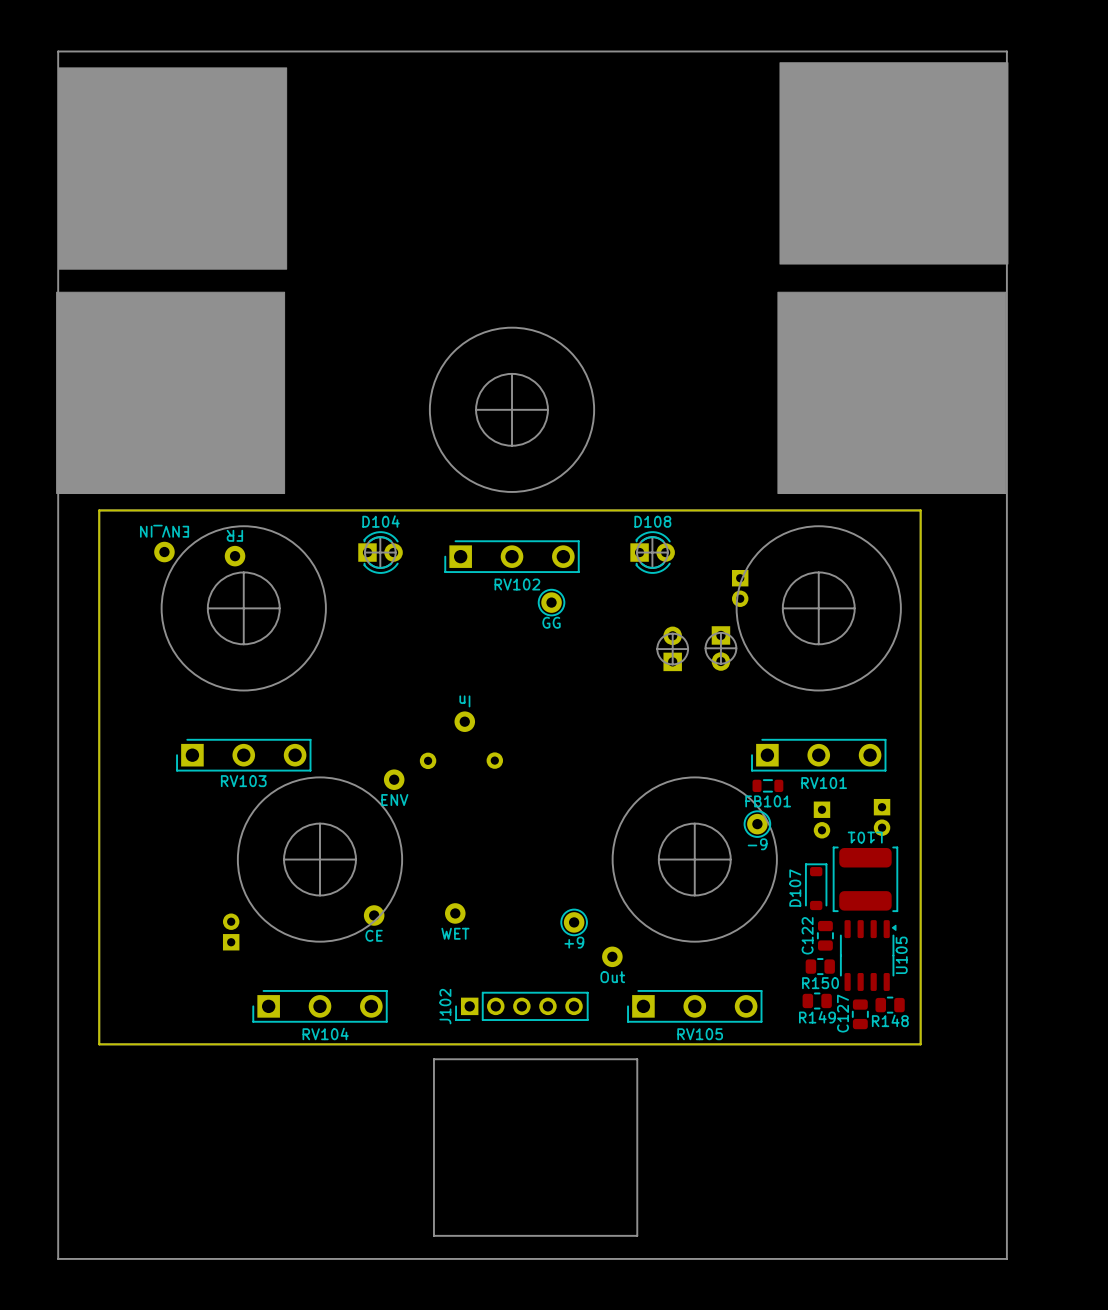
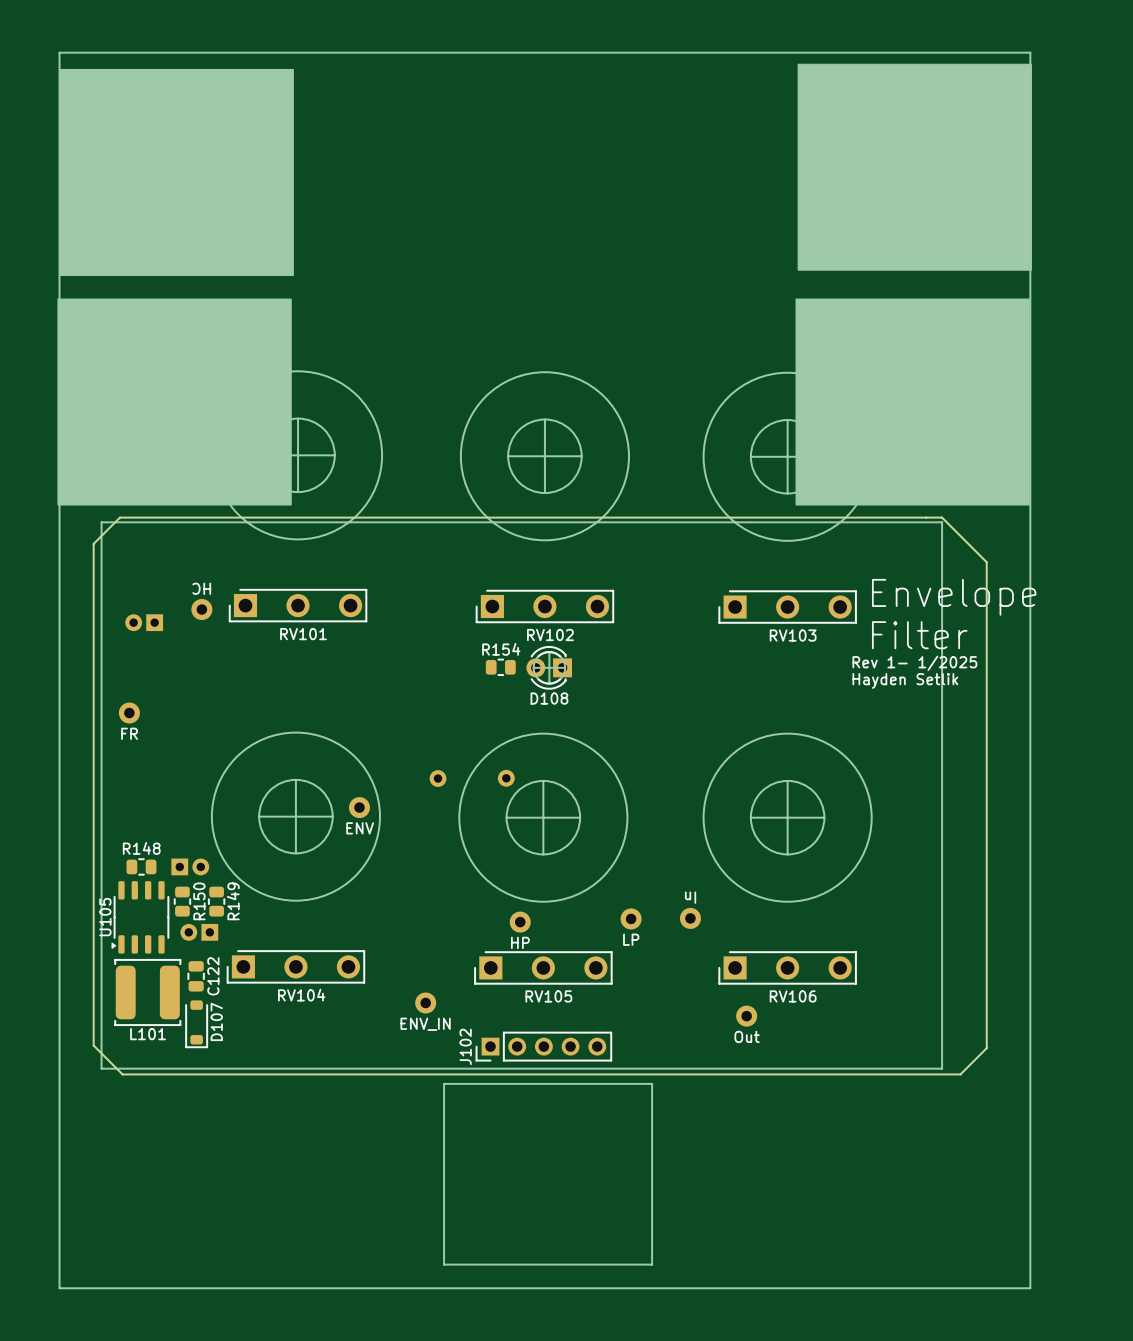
RV102 position: (512, 449) -> (544, 497)
board edge: (99, 510) (920, 510) (920, 1044) (99, 1044) (99, 510) -> (119, 517) (93, 543) (93, 1045) (122, 1074) (960, 1074) (986, 1048) (986, 562) (942, 517) (119, 517)
part value rotation: 0° (234, 535) -> 180° (129, 733)
part value position: FR (234, 535) -> FR (129, 733)
part: ENV_IN (164, 552) -> none
D104: (380, 552) -> none
D108 rotation: 0° (652, 552) -> 180° (549, 667)
D108 position: (652, 552) -> (549, 667)
part position: (235, 556) -> (129, 713)
text: none -> Envelope (954, 597)
part: (740, 588) -> none
part: none -> HC (201, 609)
part: GG (551, 602) -> none
part: none -> (144, 622)
text: none -> Filter (919, 635)
RV103 position: (243, 648) -> (787, 497)
part: (672, 648) -> none
part: (720, 648) -> none
RV101 position: (818, 648) -> (298, 496)
text: none -> Rev 1- 1/2025 (914, 663)
R154: none -> (500, 667)
text: none -> Hayden Setlik (905, 680)
part: In (464, 721) -> none
part position: (394, 779) -> (359, 807)
RV103 name position: RV103 (243, 781) -> RV103 (793, 635)
FB101: (767, 785) -> none
part: (882, 817) -> none
part: (821, 820) -> none
part: -9 (757, 824) -> none
L101 name position: L101 (865, 837) -> L101 (148, 1034)
RV106: none -> (787, 858)
part: none -> (190, 866)
L101 rotation: 0° (865, 879) -> 90° clockwise (147, 992)
L101 position: (865, 879) -> (147, 992)
D107 rotation: 0° (816, 886) -> 180° (196, 1024)
D107 position: (816, 886) -> (196, 1024)
part: none -> In (690, 918)
part: none -> LP (631, 918)
RV104 position: (320, 899) -> (295, 857)
RV105 position: (694, 899) -> (543, 858)
part: none -> HP (520, 922)
part: WET (455, 913) -> none
part: CE (374, 915) -> none
part: +9 (574, 922) -> none
part rotation: 0° (231, 931) -> 90° counterclockwise (199, 932)
part position: (231, 931) -> (199, 932)
C122 name position: C122 (807, 935) -> C122 (213, 976)
C122 position: (825, 935) -> (196, 976)
U105 rotation: 0° (868, 955) -> 180° (140, 917)
U105 position: (868, 955) -> (140, 917)
part position: (612, 956) -> (746, 1016)
R150 rotation: 0° (820, 966) -> 90° clockwise (182, 901)
R150 position: (820, 966) -> (182, 901)
part: none -> ENV_IN (425, 1003)
R150 name position: R150 (820, 983) -> R150 (199, 901)
R149 rotation: 0° (817, 1000) -> 90° clockwise (216, 901)
R149 position: (817, 1000) -> (216, 901)
R148 position: (890, 1005) -> (141, 866)
J102 position: (521, 1006) -> (543, 1046)
C127: (860, 1014) -> none
R149 name position: R149 (817, 1017) -> R149 (233, 901)
R148 name position: R148 (890, 1020) -> R148 (141, 848)

